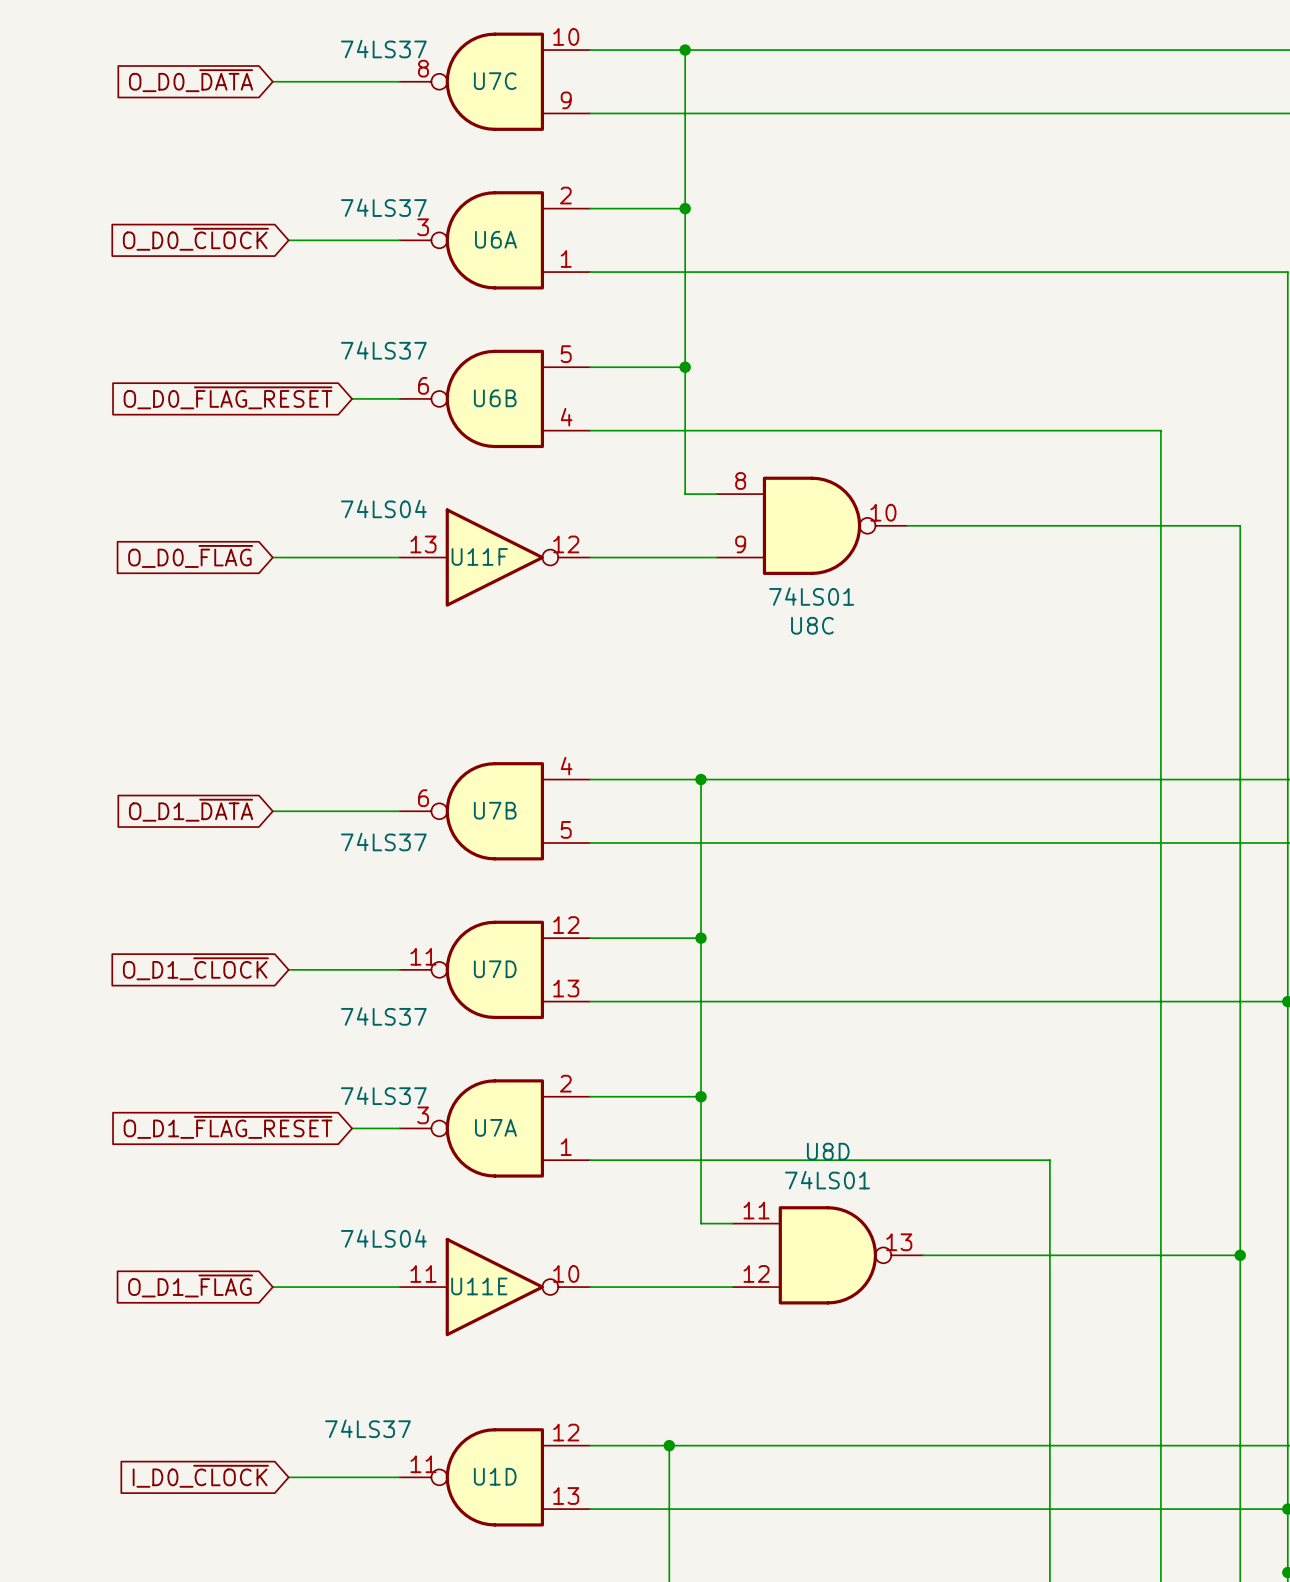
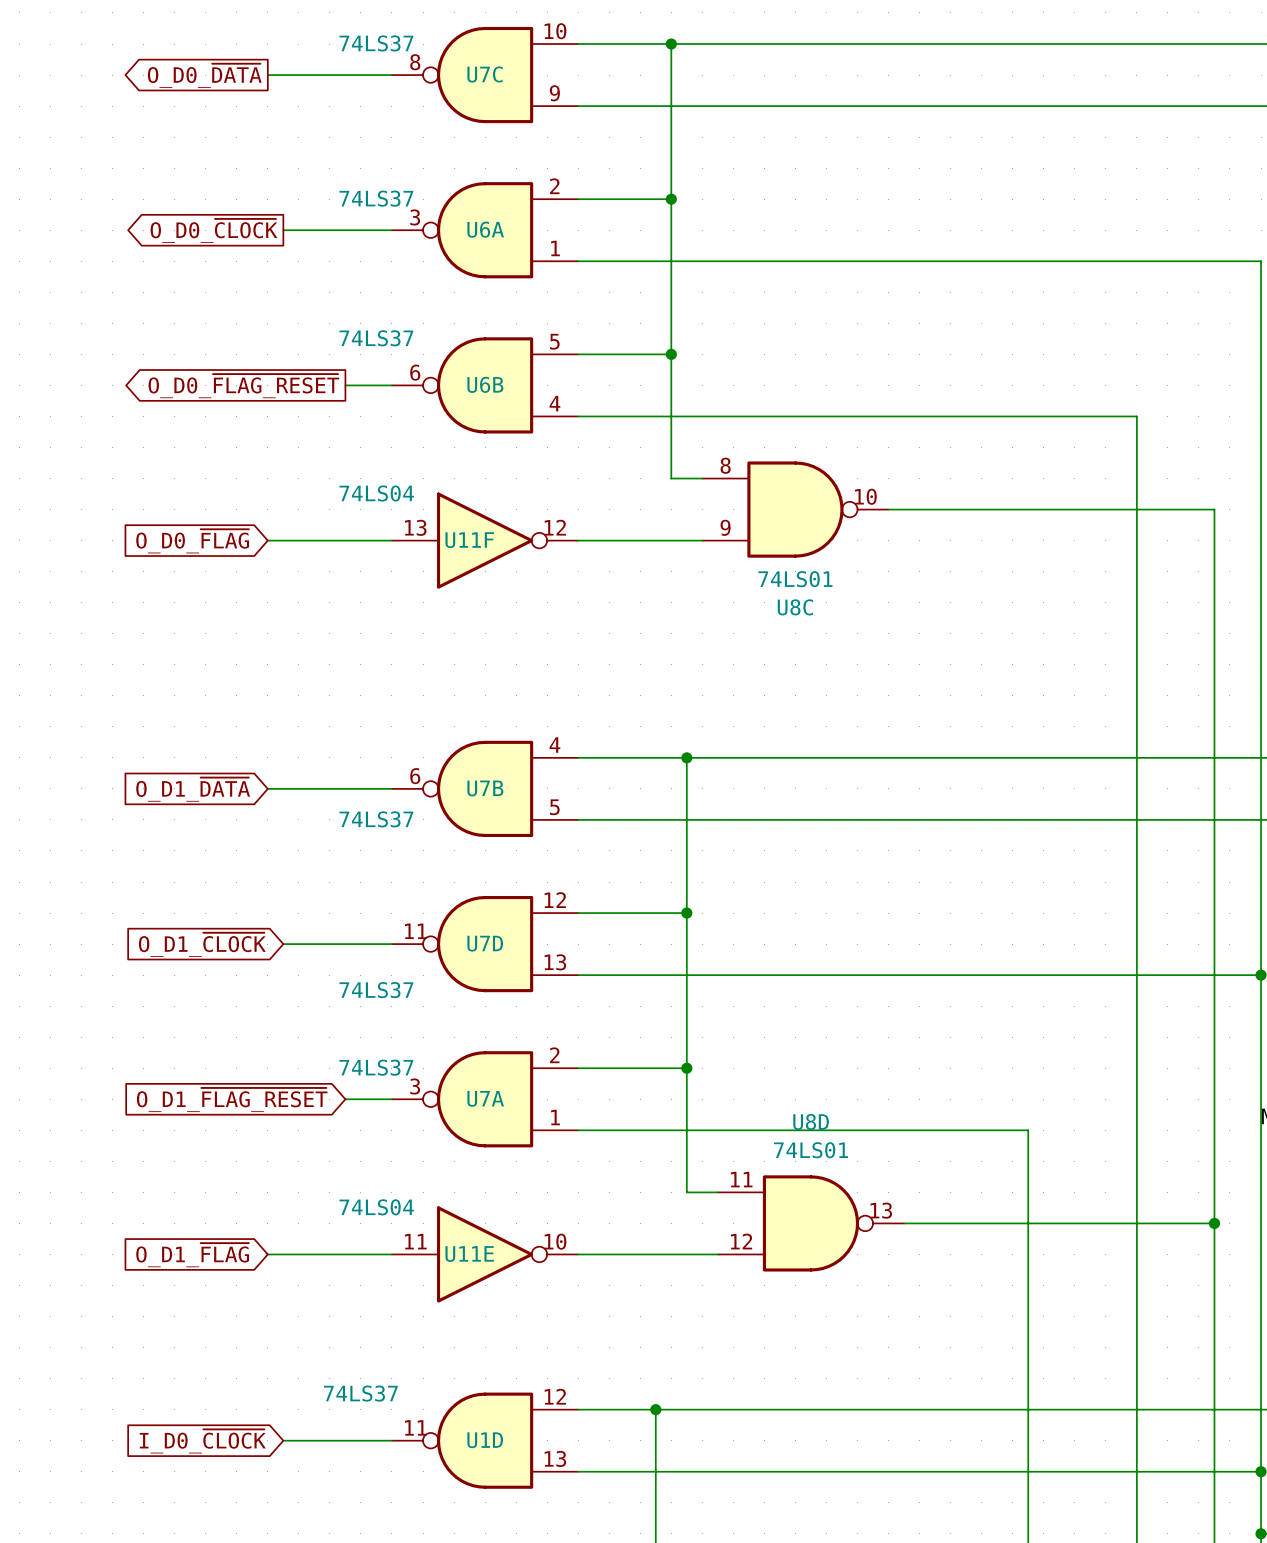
global label shape: input (191, 80) -> output (204, 75)
global label shape: input (195, 239) -> output (214, 230)
global label shape: input (228, 397) -> output (243, 386)

